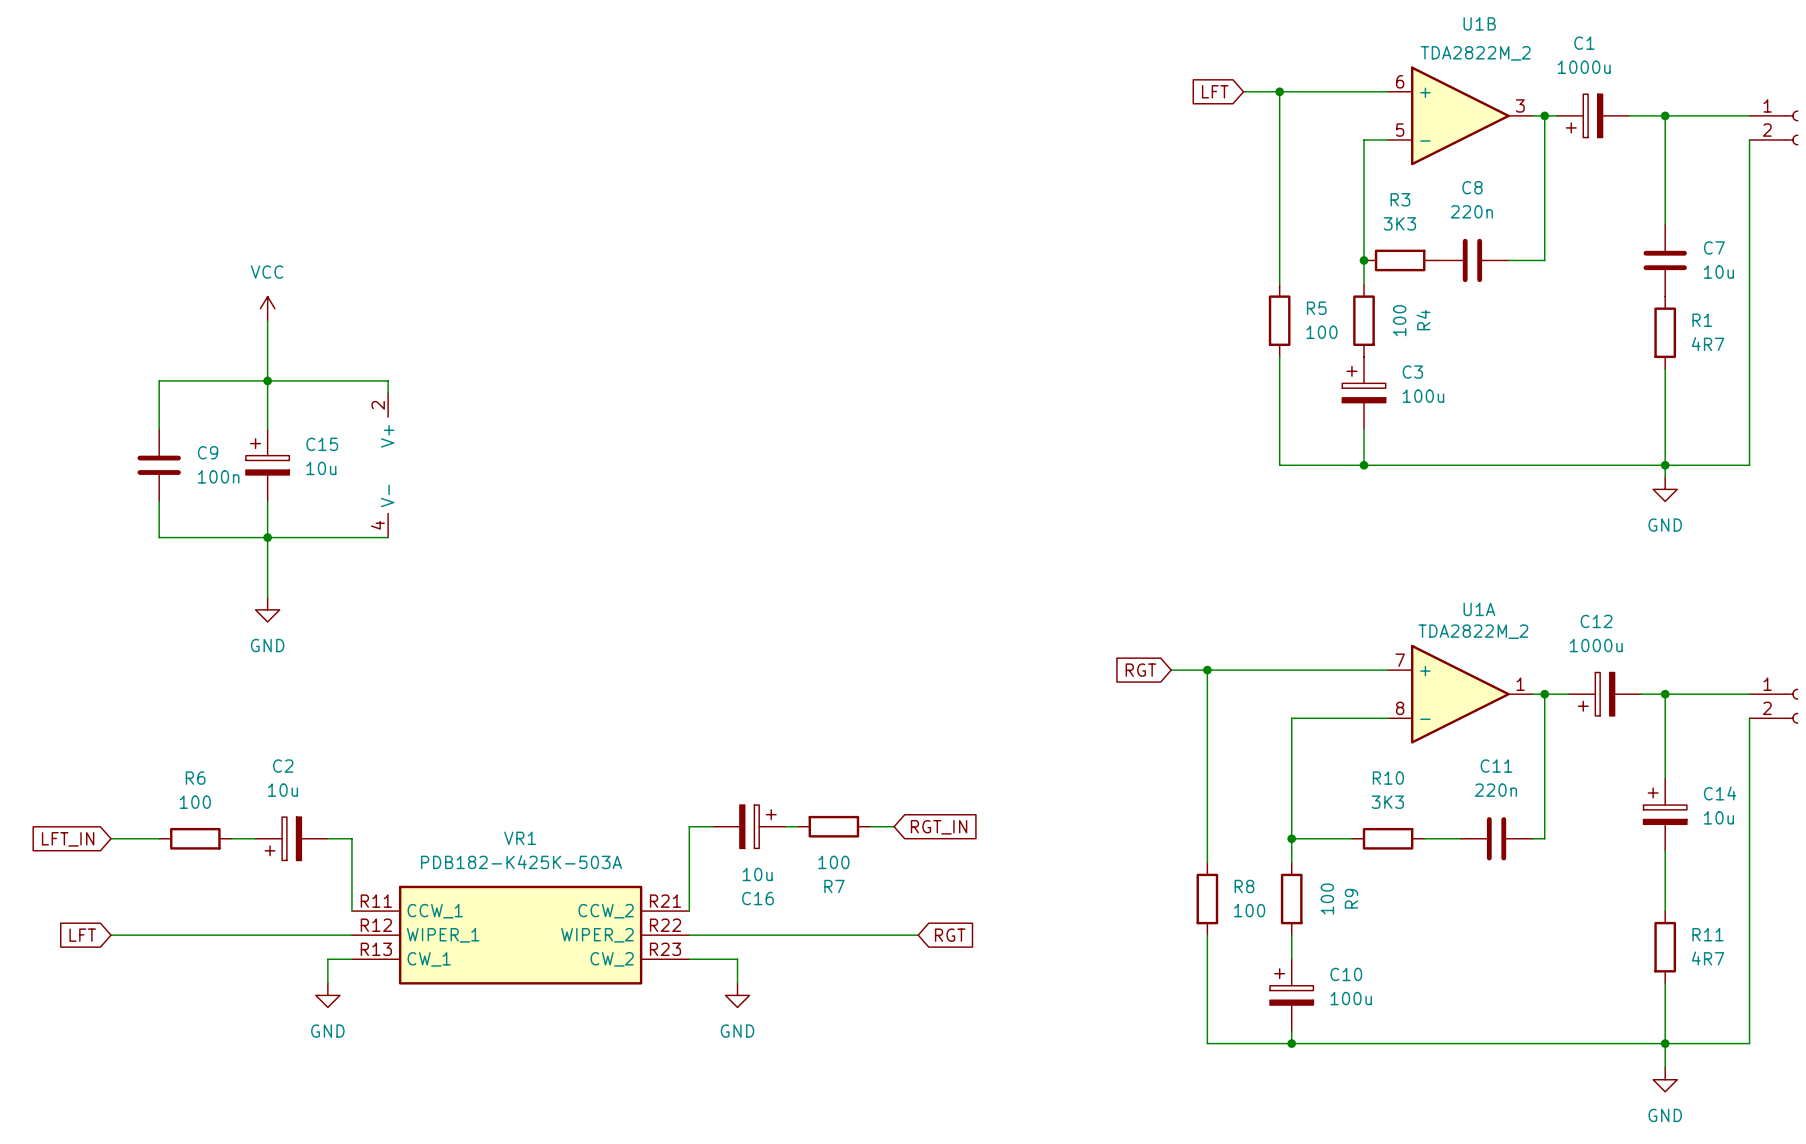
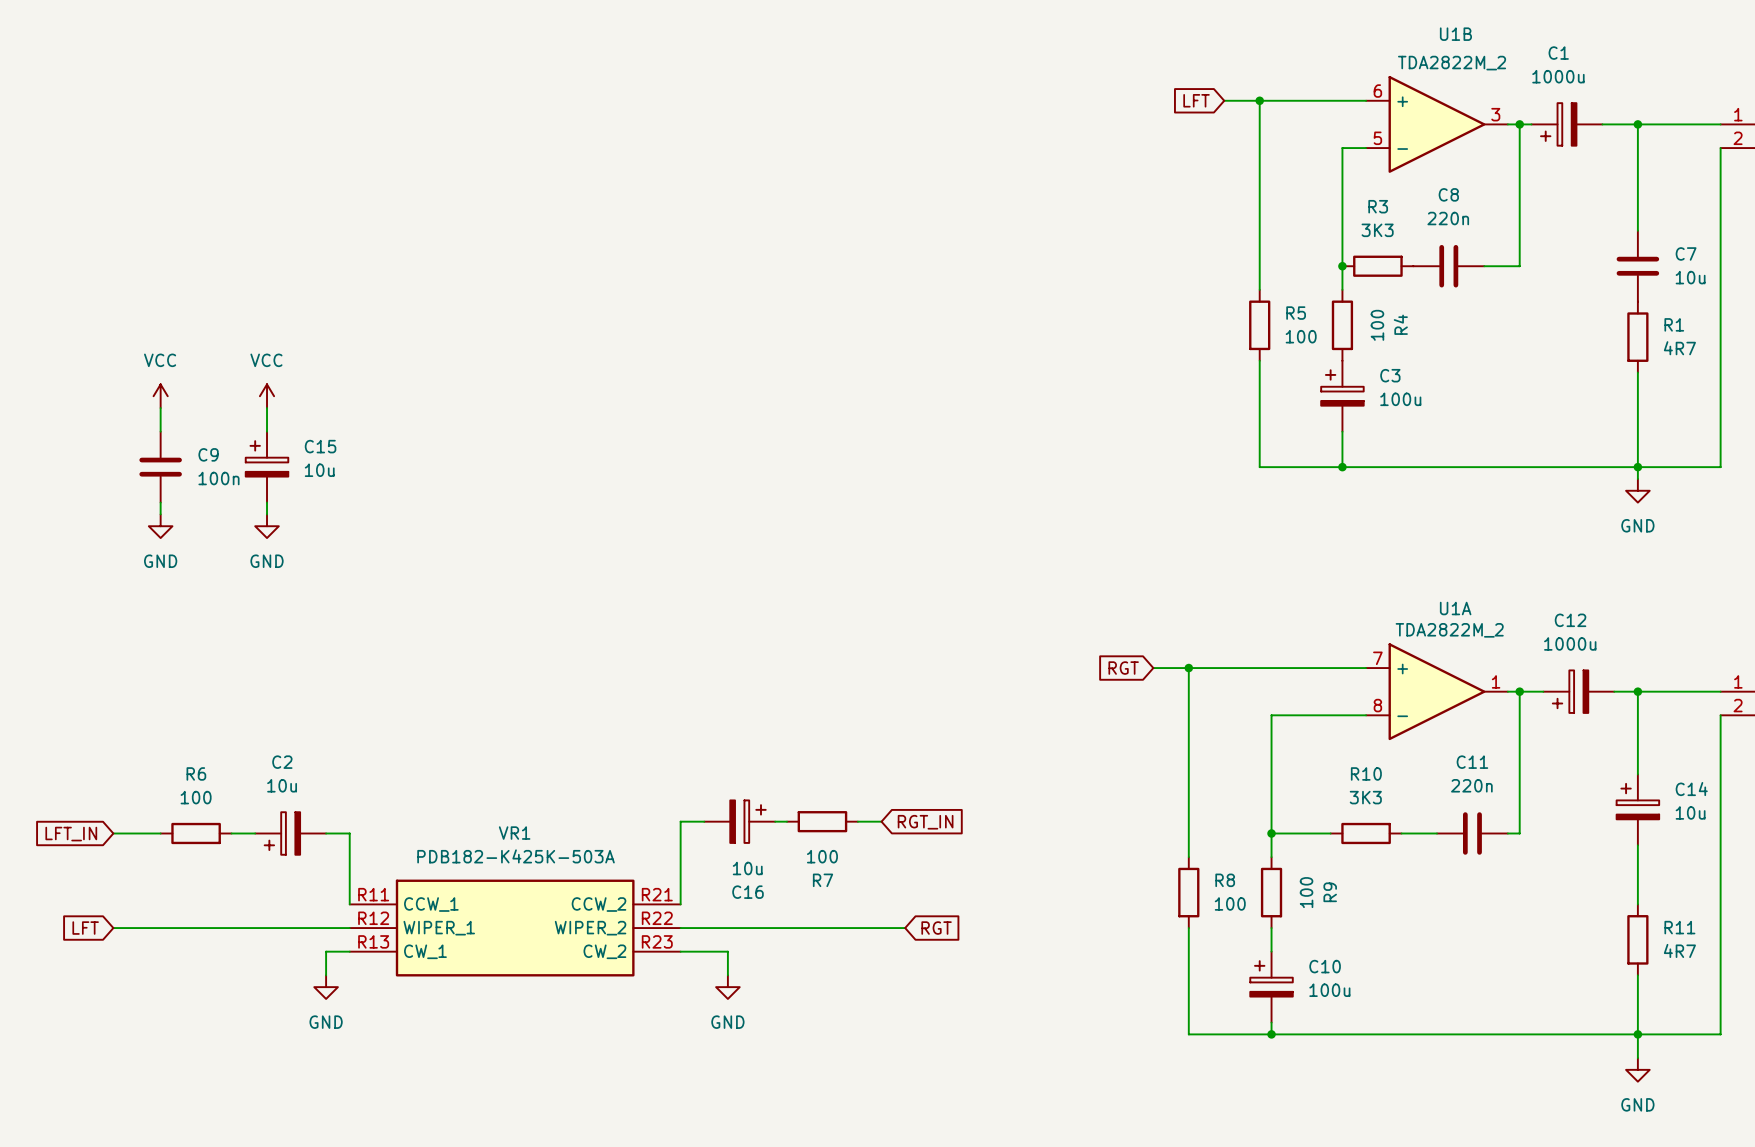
power symbol: VCC (267, 308) -> none
wire: (267, 320) (267, 405) -> none
junction: (267, 380) -> none
power symbol: none -> VCC (160, 396)
power symbol: none -> VCC (267, 396)
wire: (388, 393) (388, 380) (159, 380) (159, 405) -> none
part: (388, 465) -> none
wire: (159, 513) (159, 537) (388, 537) -> none
wire: (267, 513) (267, 597) -> none
power symbol: none -> GND (160, 526)
power symbol: none -> GND (267, 526)
junction: (267, 537) -> none
power symbol: GND (267, 609) -> none

